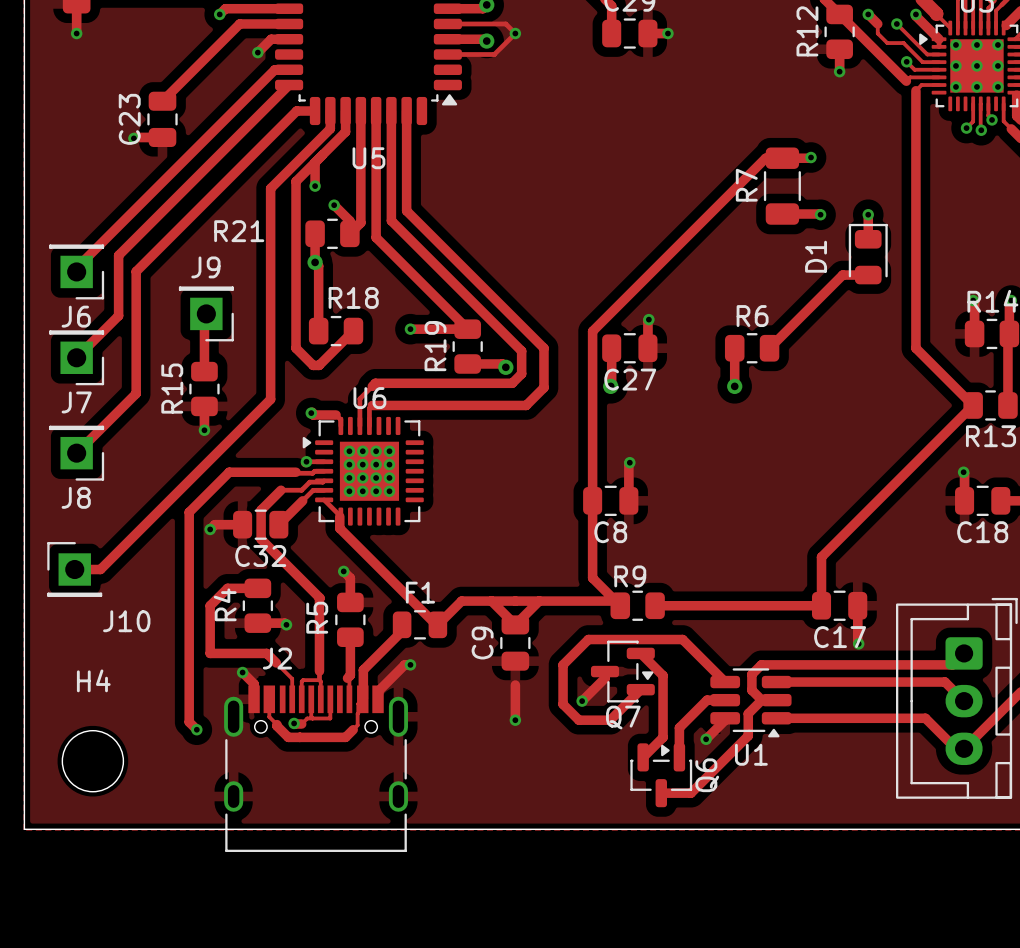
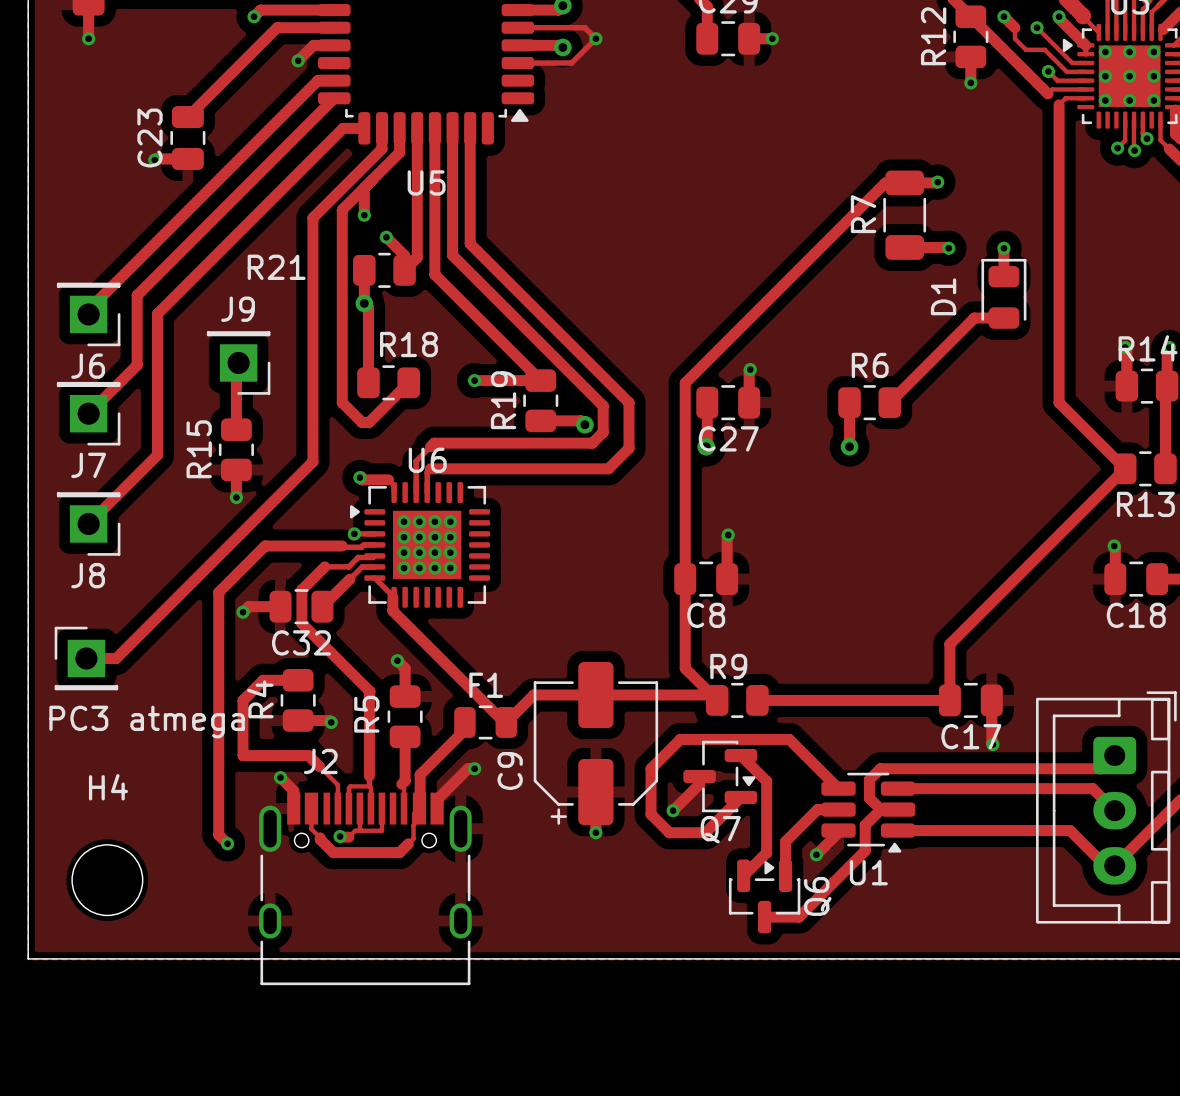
track: (491, 601) (515, 624) (539, 601) -> none
C9 footprint: [500, 615, 531, 671] -> [533, 661, 659, 826]
J10 name: J10 (126, 621) -> PC3 atmega (147, 722)
C9 name position: C9 (482, 643) -> C9 (510, 770)

